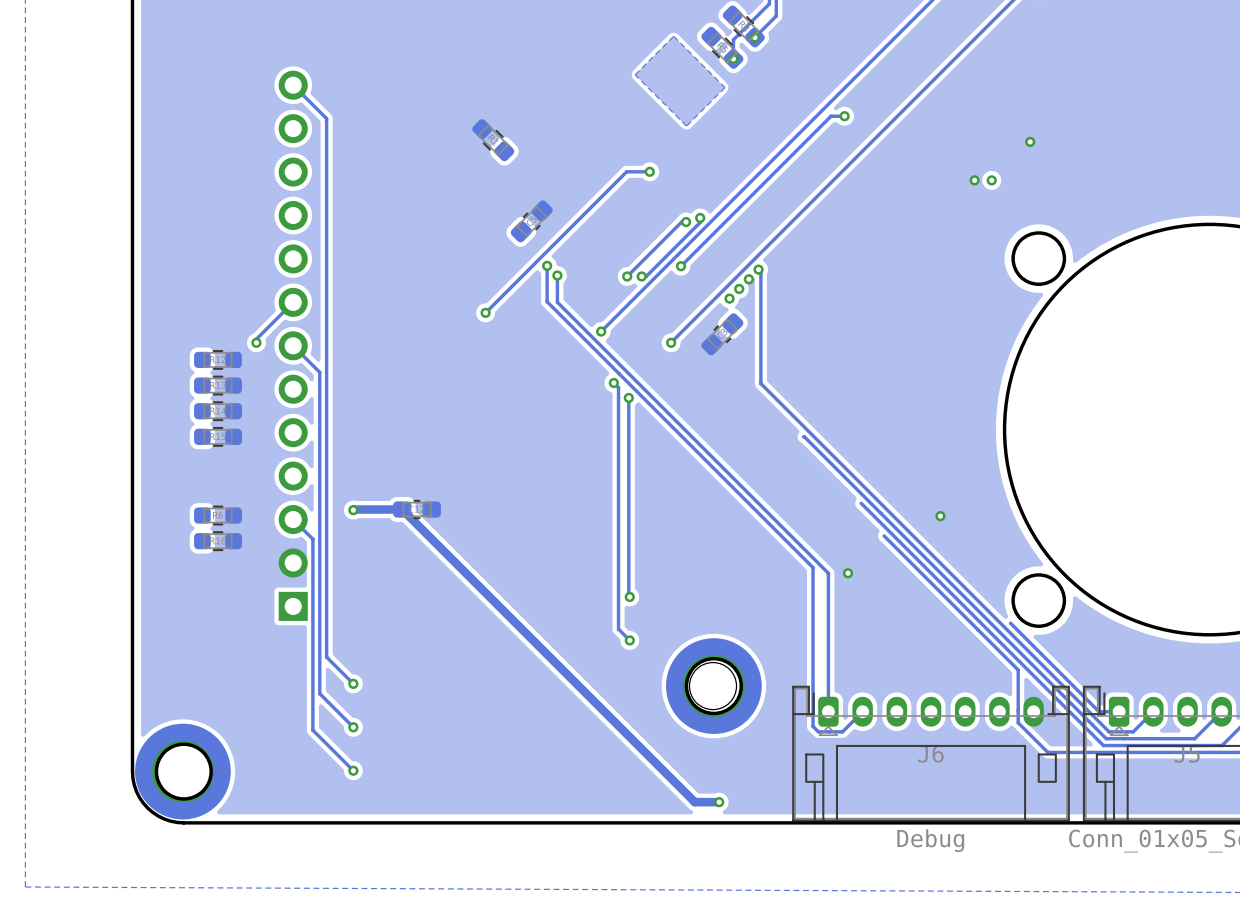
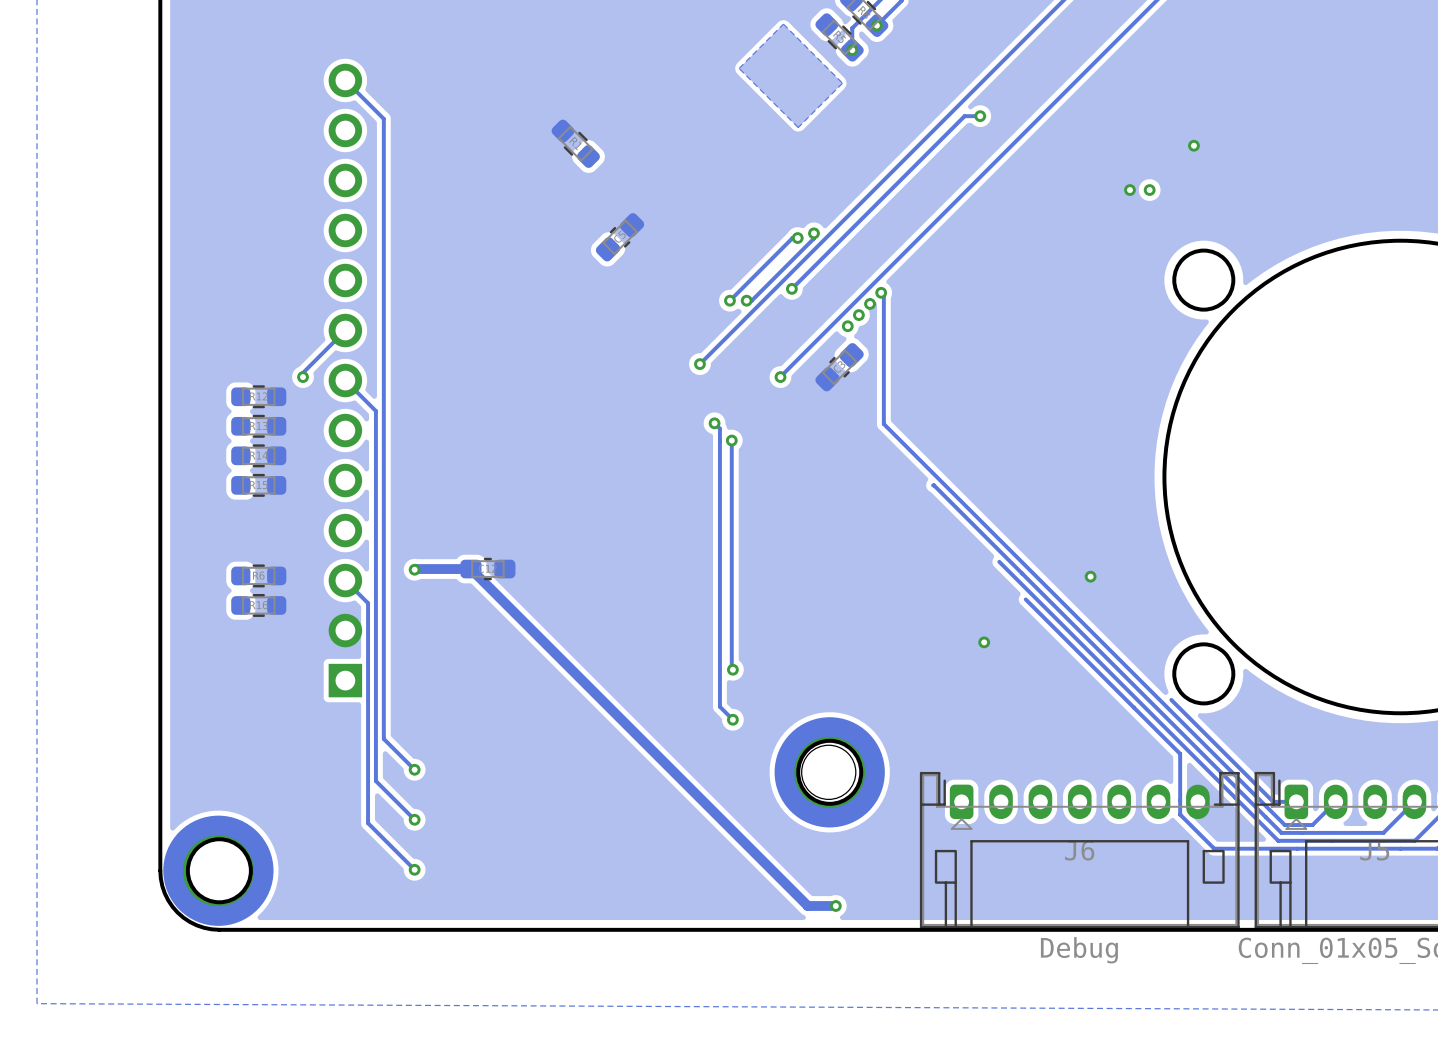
track: (649, 171) (626, 171) (485, 312) -> none
via: (649, 171) -> none
track: (547, 265) (547, 301) (813, 567) (813, 726) (818, 731) (842, 731) (862, 711) -> none
via: (547, 265) -> none
track: (557, 275) (557, 302) (828, 573) (828, 711) -> none
via: (557, 275) -> none
via: (485, 312) -> none

